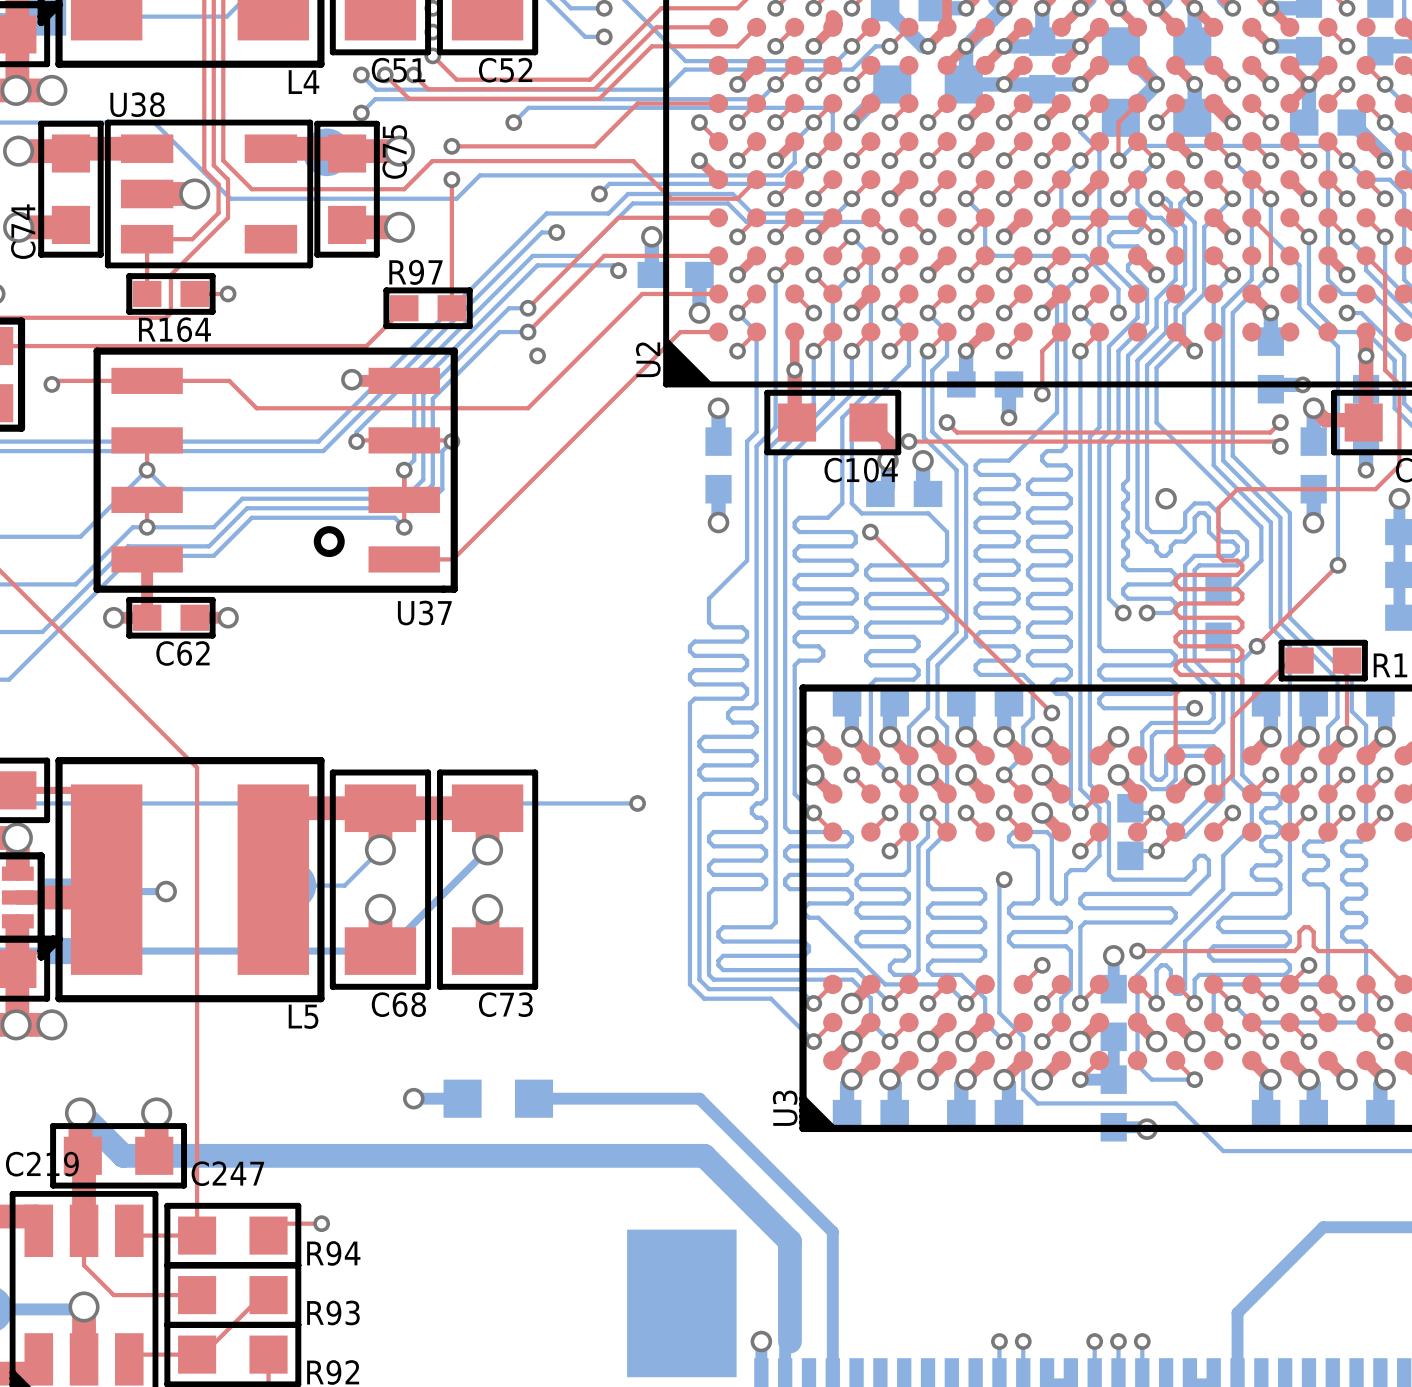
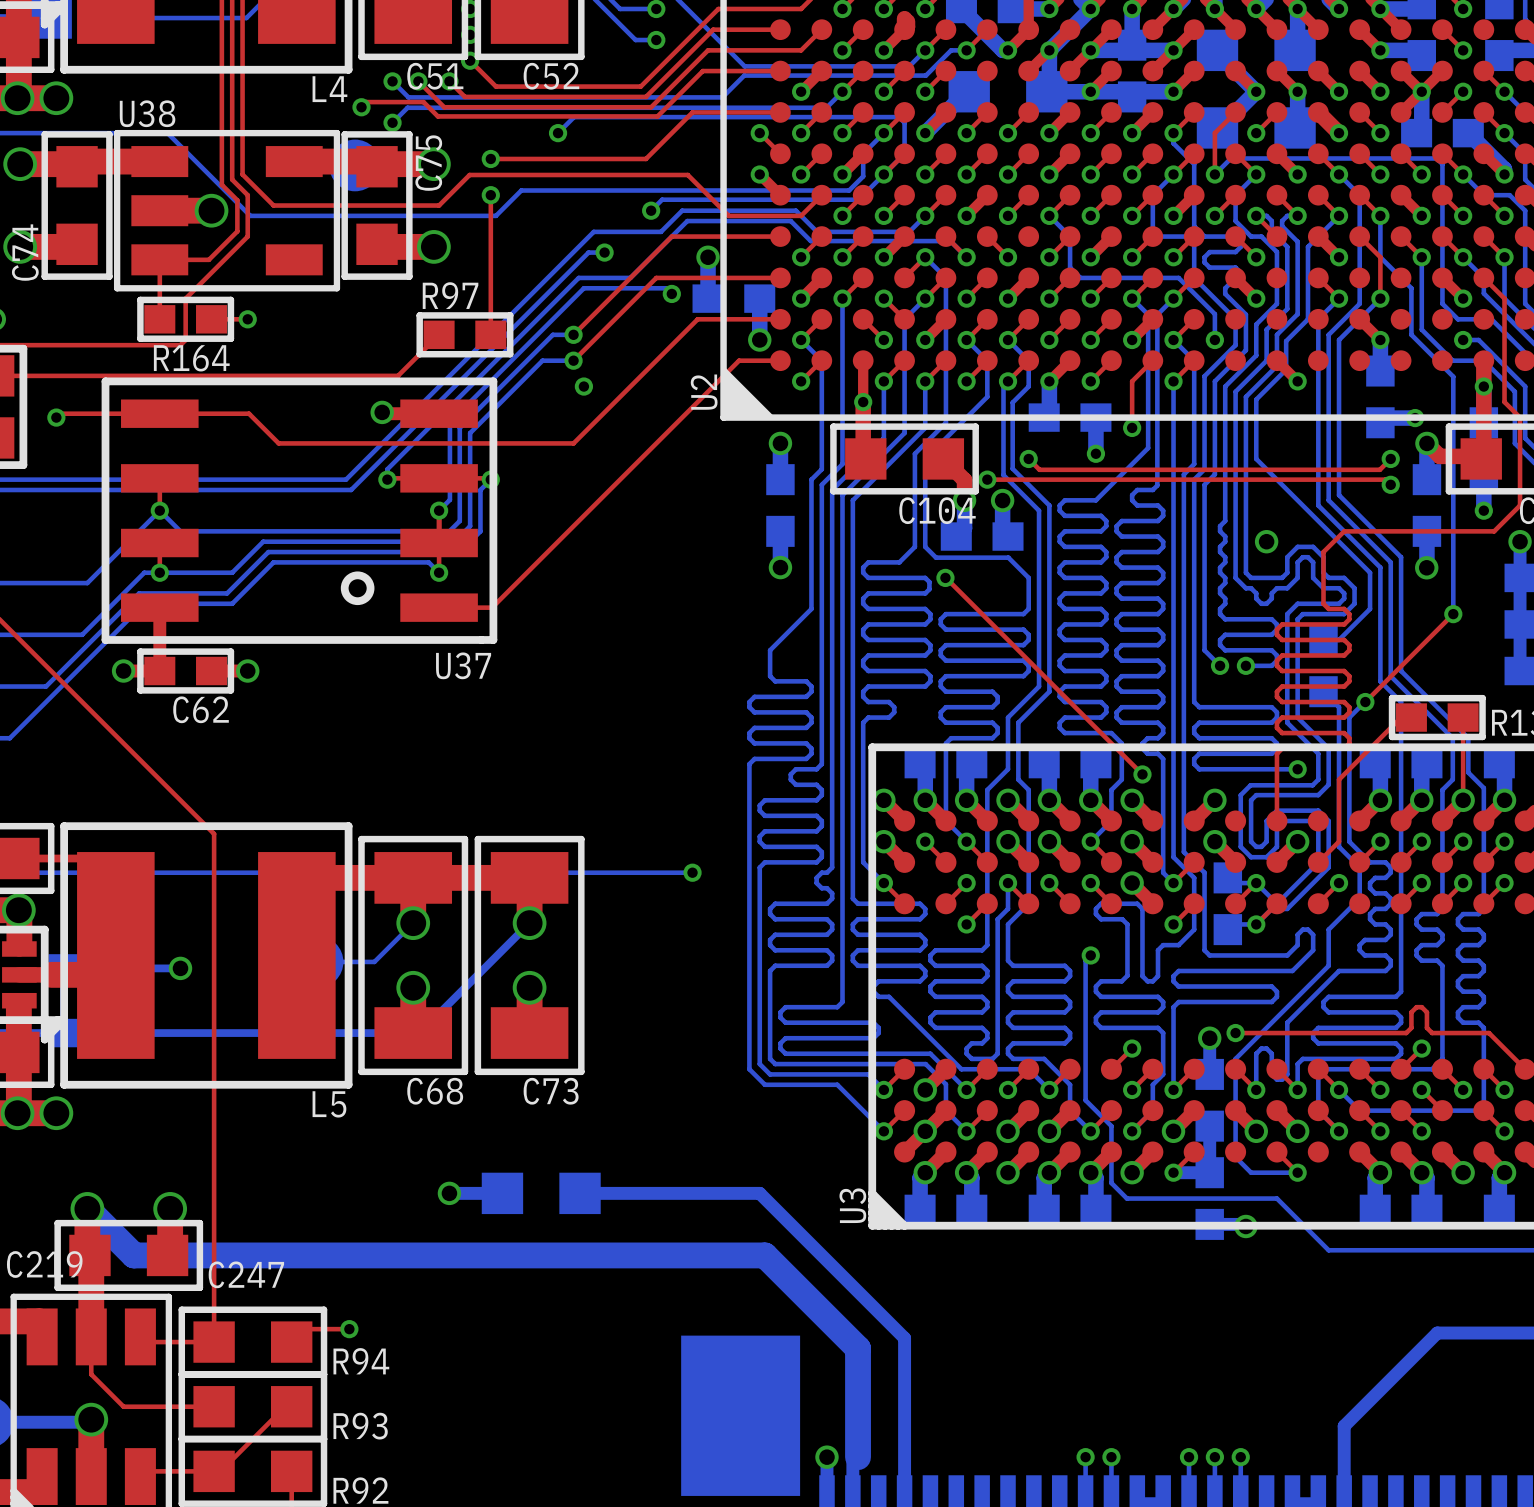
top track: none -> (780, 71) (702, 71) (657, 116) (437, 116) (423, 102) (366, 102) (361, 107)
via: none -> (361, 107)

